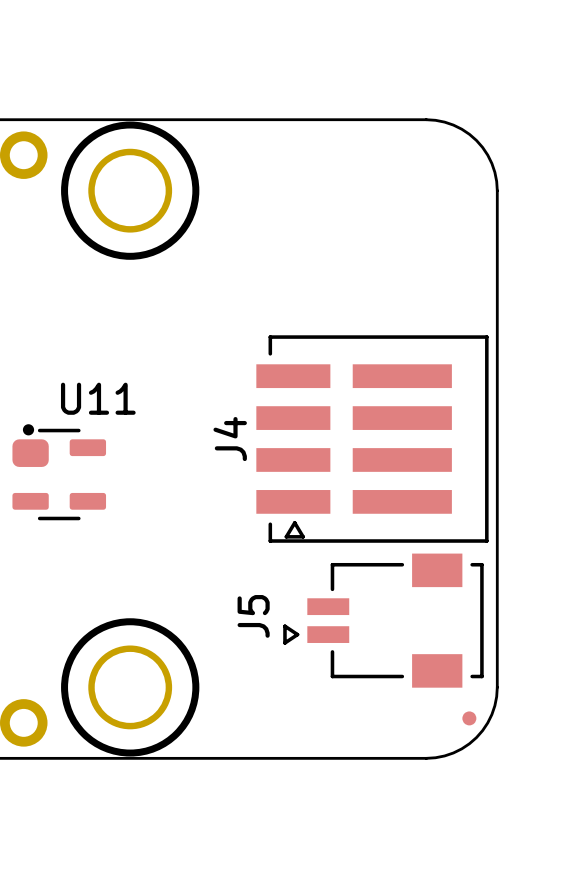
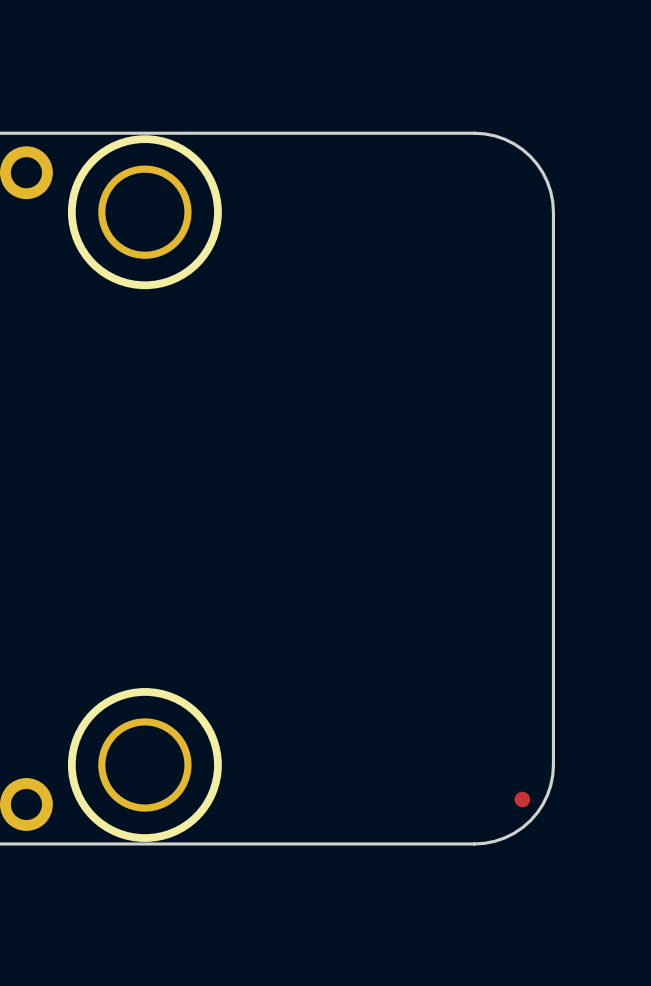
J4: (372, 439) -> none
U11: (59, 472) -> none
J5: (383, 620) -> none

